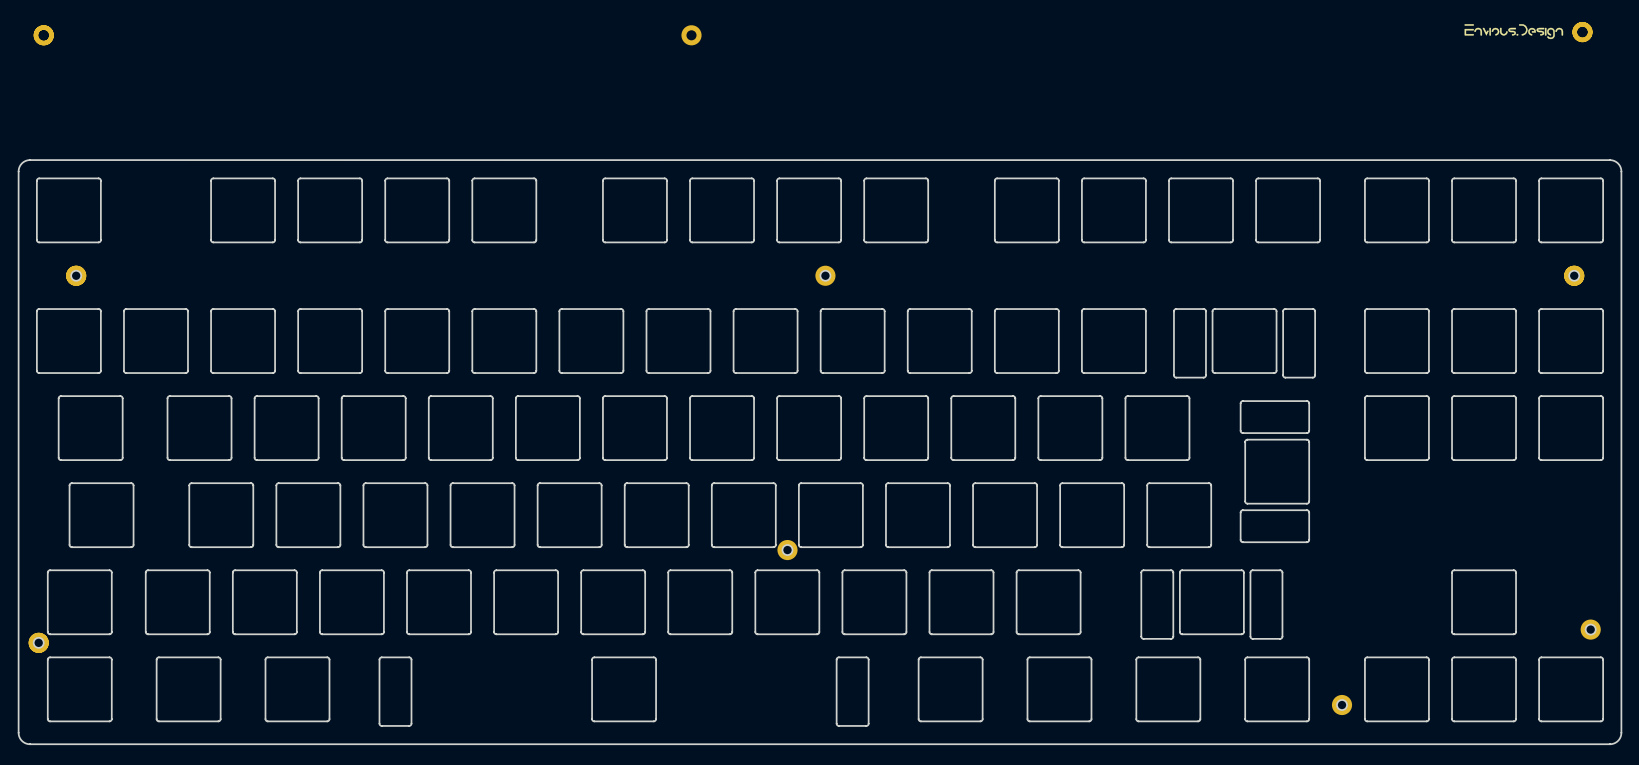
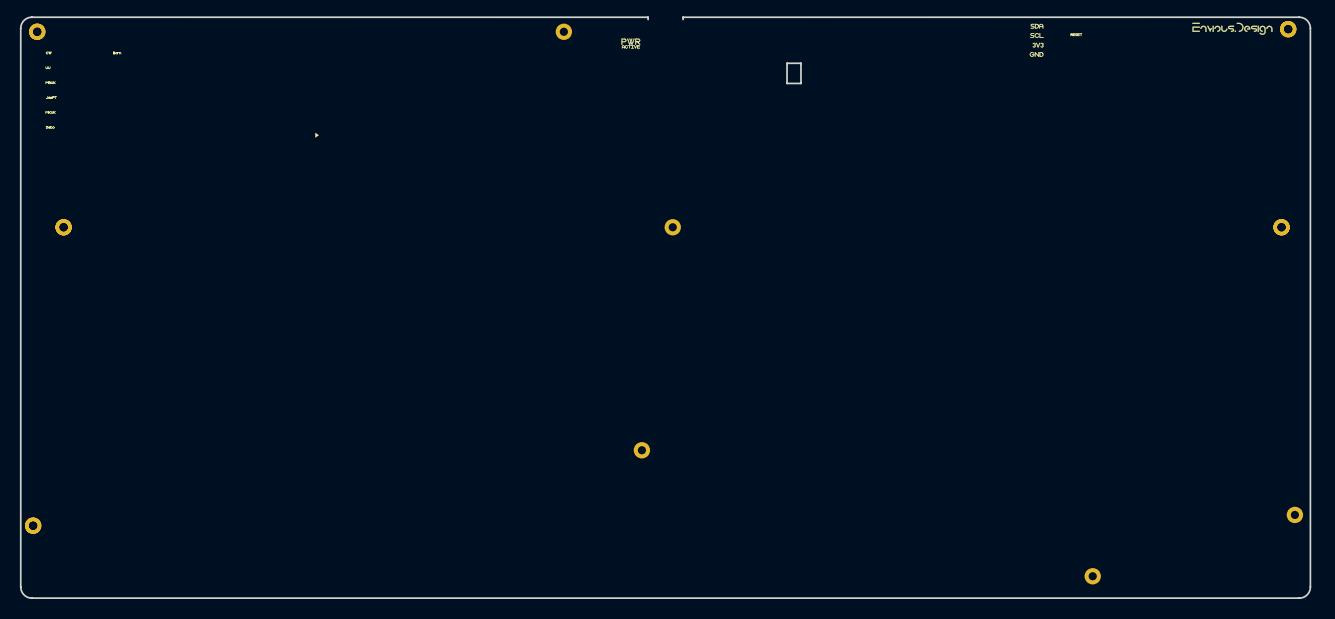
board edge: none -> (648, 19) (648, 17) (31, 17) (24, 20) (20, 28) (20, 586) (24, 594) (31, 598) (1299, 598) (1307, 594) (1310, 586) (1310, 28) (1307, 20) (1299, 17) (683, 17) (683, 19)
drawing: none -> [1030, 23, 1044, 29]
drawing: none -> [1030, 33, 1044, 38]
drawing: none -> [1070, 33, 1083, 37]
drawing: none -> [621, 38, 641, 49]
drawing: none -> [1032, 42, 1044, 48]
drawing: none -> [45, 51, 52, 55]
drawing: none -> [113, 51, 122, 55]
drawing: none -> [1029, 52, 1044, 57]
board edge: none -> (787, 63) (800, 63) (800, 83) (787, 83) (787, 63)
drawing: none -> [45, 66, 51, 70]
drawing: none -> [45, 81, 56, 85]
drawing: none -> [45, 96, 57, 99]
drawing: none -> [45, 111, 56, 114]
drawing: none -> [45, 125, 55, 129]
drawing: none -> [315, 132, 319, 138]
board edge: (30, 160) (1614, 160) (1619, 164) (1621, 171) (1620, 737) (1615, 742) (1609, 744) (26, 743) (21, 739) (18, 732) (18, 171) (21, 163) (30, 160) -> none
board edge: (39, 178) (100, 179) (100, 241) (37, 241) (36, 180) (39, 178) -> none
board edge: (213, 178) (274, 179) (274, 241) (211, 241) (211, 180) (213, 178) -> none
board edge: (300, 178) (361, 179) (361, 241) (298, 241) (298, 180) (300, 178) -> none
board edge: (387, 178) (448, 179) (448, 241) (385, 241) (385, 180) (387, 178) -> none
board edge: (474, 178) (535, 179) (535, 241) (472, 241) (472, 180) (474, 178) -> none
board edge: (605, 178) (666, 179) (666, 241) (603, 241) (602, 180) (605, 178) -> none
board edge: (692, 178) (753, 179) (753, 241) (690, 241) (690, 180) (692, 178) -> none
board edge: (779, 178) (840, 179) (840, 241) (777, 241) (777, 180) (779, 178) -> none
board edge: (866, 178) (927, 179) (927, 241) (864, 241) (864, 180) (866, 178) -> none
board edge: (997, 178) (1058, 179) (1058, 241) (995, 241) (994, 180) (997, 178) -> none
board edge: (1084, 178) (1145, 179) (1145, 241) (1082, 241) (1081, 180) (1084, 178) -> none
board edge: (1171, 178) (1232, 179) (1232, 241) (1169, 241) (1169, 180) (1171, 178) -> none
board edge: (1258, 178) (1319, 179) (1319, 241) (1256, 241) (1256, 180) (1258, 178) -> none
board edge: (1367, 178) (1428, 179) (1428, 241) (1365, 241) (1364, 180) (1367, 178) -> none
board edge: (1454, 178) (1515, 179) (1515, 241) (1452, 241) (1452, 180) (1454, 178) -> none
board edge: (1541, 178) (1602, 179) (1602, 241) (1539, 241) (1539, 180) (1541, 178) -> none
round board edge: [70, 270, 82, 282] -> none
round board edge: [820, 270, 831, 282] -> none
round board edge: [1568, 270, 1580, 282] -> none
board edge: (39, 309) (100, 309) (100, 372) (37, 372) (36, 311) (39, 309) -> none
board edge: (126, 309) (187, 309) (187, 372) (124, 372) (123, 311) (126, 309) -> none
board edge: (213, 309) (274, 309) (274, 372) (211, 372) (211, 311) (213, 309) -> none
board edge: (300, 309) (361, 309) (361, 372) (298, 372) (298, 311) (300, 309) -> none
board edge: (387, 309) (448, 309) (448, 372) (385, 372) (385, 311) (387, 309) -> none
board edge: (474, 309) (535, 309) (535, 372) (472, 372) (472, 311) (474, 309) -> none
board edge: (561, 309) (622, 309) (622, 372) (560, 372) (559, 311) (561, 309) -> none
board edge: (648, 309) (709, 309) (709, 372) (647, 372) (646, 311) (648, 309) -> none
board edge: (735, 309) (796, 309) (796, 372) (734, 372) (733, 311) (735, 309) -> none
board edge: (822, 309) (883, 309) (883, 372) (821, 372) (820, 311) (822, 309) -> none
board edge: (910, 309) (971, 309) (971, 372) (908, 372) (907, 311) (910, 309) -> none
board edge: (997, 309) (1058, 309) (1058, 372) (995, 372) (994, 311) (997, 309) -> none
board edge: (1084, 309) (1145, 309) (1145, 372) (1082, 372) (1081, 311) (1084, 309) -> none
board edge: (1176, 309) (1205, 310) (1204, 377) (1174, 376) (1173, 311) (1176, 309) -> none
board edge: (1214, 309) (1275, 309) (1275, 372) (1213, 372) (1212, 311) (1214, 309) -> none
board edge: (1285, 309) (1314, 310) (1313, 377) (1283, 376) (1283, 311) (1285, 309) -> none
board edge: (1367, 309) (1428, 309) (1428, 372) (1365, 372) (1364, 311) (1367, 309) -> none
board edge: (1454, 309) (1515, 309) (1515, 372) (1452, 372) (1452, 311) (1454, 309) -> none
board edge: (1541, 309) (1602, 309) (1602, 372) (1539, 372) (1539, 311) (1541, 309) -> none
board edge: (60, 396) (121, 396) (121, 459) (59, 459) (58, 398) (60, 396) -> none
board edge: (169, 396) (230, 396) (230, 459) (168, 459) (167, 398) (169, 396) -> none
board edge: (256, 396) (317, 396) (317, 459) (255, 459) (254, 398) (256, 396) -> none
board edge: (343, 396) (405, 396) (405, 459) (342, 459) (341, 398) (343, 396) -> none
board edge: (431, 396) (492, 396) (492, 459) (429, 459) (428, 398) (431, 396) -> none
board edge: (518, 396) (579, 396) (579, 459) (516, 459) (515, 398) (518, 396) -> none
board edge: (605, 396) (666, 396) (666, 459) (603, 459) (602, 398) (605, 396) -> none
board edge: (692, 396) (753, 396) (753, 459) (690, 459) (690, 398) (692, 396) -> none
board edge: (779, 396) (840, 396) (840, 459) (777, 459) (777, 398) (779, 396) -> none
board edge: (866, 396) (927, 396) (927, 459) (864, 459) (864, 398) (866, 396) -> none
board edge: (953, 396) (1014, 396) (1014, 459) (951, 459) (951, 398) (953, 396) -> none
board edge: (1040, 396) (1101, 396) (1101, 459) (1039, 459) (1038, 398) (1040, 396) -> none
board edge: (1127, 396) (1188, 396) (1188, 459) (1126, 459) (1125, 398) (1127, 396) -> none
board edge: (1367, 396) (1428, 396) (1428, 459) (1365, 459) (1364, 398) (1367, 396) -> none
board edge: (1454, 396) (1515, 396) (1515, 459) (1452, 459) (1452, 398) (1454, 396) -> none
board edge: (1541, 396) (1602, 396) (1602, 459) (1539, 459) (1539, 398) (1541, 396) -> none
board edge: (1242, 401) (1307, 401) (1309, 431) (1241, 432) (1240, 403) (1242, 401) -> none
board edge: (1247, 439) (1308, 440) (1308, 502) (1245, 502) (1245, 441) (1247, 439) -> none
board edge: (71, 483) (132, 483) (132, 546) (70, 546) (69, 485) (71, 483) -> none
board edge: (191, 483) (252, 483) (252, 546) (189, 546) (189, 485) (191, 483) -> none
board edge: (278, 483) (339, 483) (339, 546) (277, 546) (276, 485) (278, 483) -> none
board edge: (365, 483) (426, 483) (426, 546) (364, 546) (363, 485) (365, 483) -> none
board edge: (452, 483) (513, 483) (513, 546) (451, 546) (450, 485) (452, 483) -> none
board edge: (539, 483) (600, 483) (600, 546) (538, 546) (537, 485) (539, 483) -> none
board edge: (627, 483) (688, 483) (688, 546) (625, 546) (624, 485) (627, 483) -> none
board edge: (714, 483) (775, 483) (775, 546) (712, 546) (711, 485) (714, 483) -> none
board edge: (801, 483) (862, 483) (862, 546) (799, 546) (798, 485) (801, 483) -> none
board edge: (888, 483) (949, 483) (949, 546) (886, 546) (885, 485) (888, 483) -> none
board edge: (975, 483) (1036, 483) (1036, 546) (973, 546) (973, 485) (975, 483) -> none
board edge: (1062, 483) (1123, 483) (1123, 546) (1060, 546) (1060, 485) (1062, 483) -> none
board edge: (1149, 483) (1210, 483) (1210, 546) (1147, 546) (1147, 485) (1149, 483) -> none
board edge: (1242, 510) (1307, 510) (1308, 540) (1242, 542) (1240, 512) (1242, 510) -> none
round board edge: [782, 544, 793, 556] -> none
board edge: (50, 570) (111, 570) (111, 633) (48, 633) (47, 572) (50, 570) -> none
board edge: (148, 570) (209, 570) (209, 633) (146, 633) (145, 572) (148, 570) -> none
board edge: (235, 570) (296, 570) (296, 633) (233, 633) (232, 572) (235, 570) -> none
board edge: (322, 570) (383, 570) (383, 633) (320, 633) (319, 572) (322, 570) -> none
board edge: (409, 570) (470, 570) (470, 633) (407, 633) (407, 572) (409, 570) -> none
board edge: (496, 570) (557, 570) (557, 633) (494, 633) (494, 572) (496, 570) -> none
board edge: (583, 570) (644, 570) (644, 633) (581, 633) (581, 572) (583, 570) -> none
board edge: (670, 570) (731, 570) (731, 633) (668, 633) (668, 572) (670, 570) -> none
board edge: (757, 570) (818, 570) (818, 633) (756, 633) (755, 572) (757, 570) -> none
board edge: (844, 570) (905, 570) (905, 633) (843, 633) (842, 572) (844, 570) -> none
board edge: (931, 570) (992, 570) (992, 633) (930, 633) (929, 572) (931, 570) -> none
board edge: (1018, 570) (1079, 570) (1079, 633) (1017, 633) (1016, 572) (1018, 570) -> none
board edge: (1143, 570) (1173, 571) (1171, 638) (1141, 637) (1141, 572) (1143, 570) -> none
board edge: (1182, 570) (1243, 570) (1243, 633) (1180, 633) (1179, 572) (1182, 570) -> none
board edge: (1252, 570) (1282, 571) (1280, 638) (1250, 637) (1250, 572) (1252, 570) -> none
board edge: (1454, 570) (1515, 570) (1515, 633) (1452, 633) (1452, 572) (1454, 570) -> none
round board edge: [1585, 624, 1596, 635] -> none
round board edge: [33, 637, 44, 649] -> none
board edge: (50, 657) (111, 658) (111, 720) (48, 720) (47, 659) (50, 657) -> none
board edge: (158, 657) (219, 658) (219, 720) (157, 720) (156, 659) (158, 657) -> none
board edge: (267, 657) (328, 658) (328, 720) (266, 720) (265, 659) (267, 657) -> none
board edge: (381, 657) (411, 658) (410, 725) (379, 724) (379, 659) (381, 657) -> none
board edge: (594, 657) (655, 658) (655, 720) (592, 720) (592, 659) (594, 657) -> none
board edge: (838, 657) (868, 658) (867, 725) (836, 724) (836, 659) (838, 657) -> none
board edge: (920, 657) (981, 658) (981, 720) (919, 720) (918, 659) (920, 657) -> none
board edge: (1029, 657) (1090, 658) (1090, 720) (1028, 720) (1027, 659) (1029, 657) -> none
board edge: (1138, 657) (1199, 658) (1199, 720) (1137, 720) (1136, 659) (1138, 657) -> none
board edge: (1247, 657) (1308, 658) (1308, 720) (1245, 720) (1245, 659) (1247, 657) -> none
board edge: (1367, 657) (1428, 658) (1428, 720) (1365, 720) (1364, 659) (1367, 657) -> none
board edge: (1454, 657) (1515, 658) (1515, 720) (1452, 720) (1452, 659) (1454, 657) -> none
board edge: (1541, 657) (1602, 658) (1602, 720) (1539, 720) (1539, 659) (1541, 657) -> none
round board edge: [1336, 699, 1348, 711] -> none

